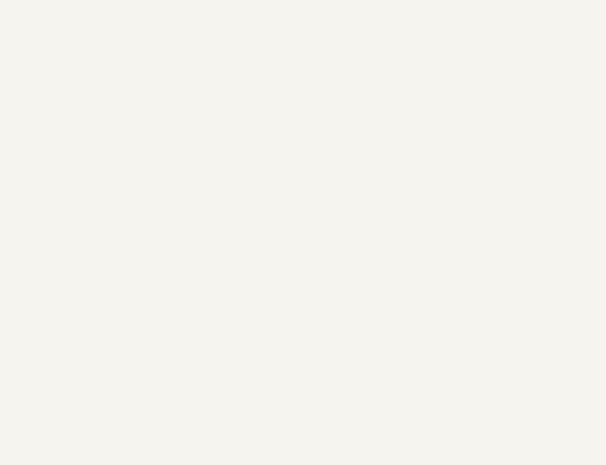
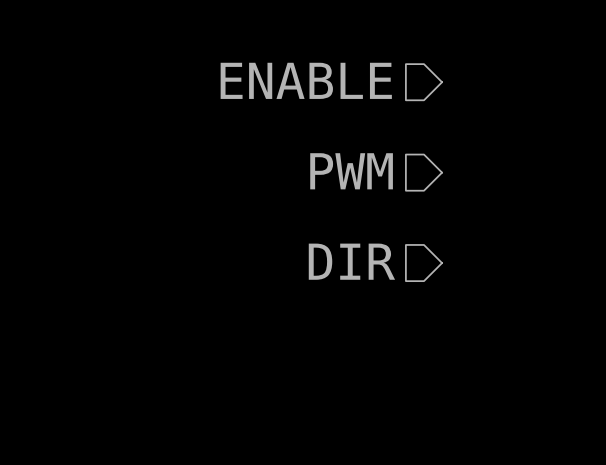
hierarchical label: none -> ENABLE (306, 80)
hierarchical label: none -> PWM (351, 171)
hierarchical label: none -> DIR (351, 261)

